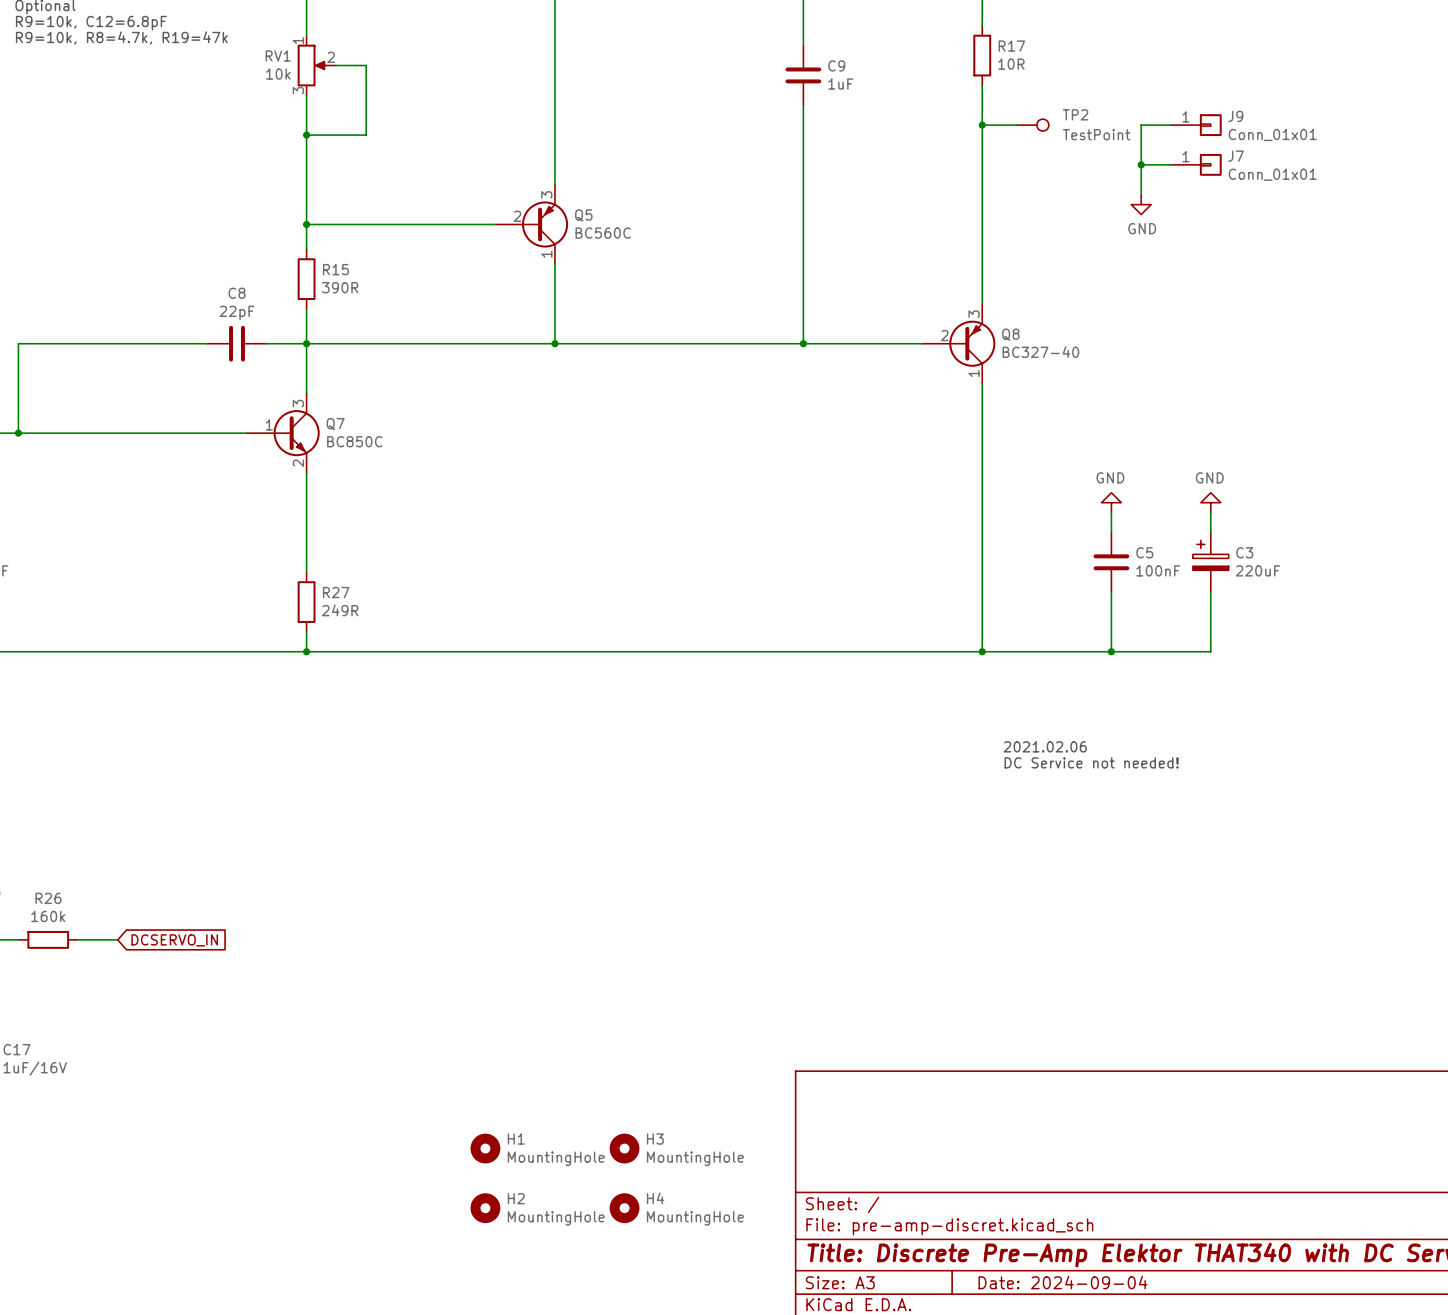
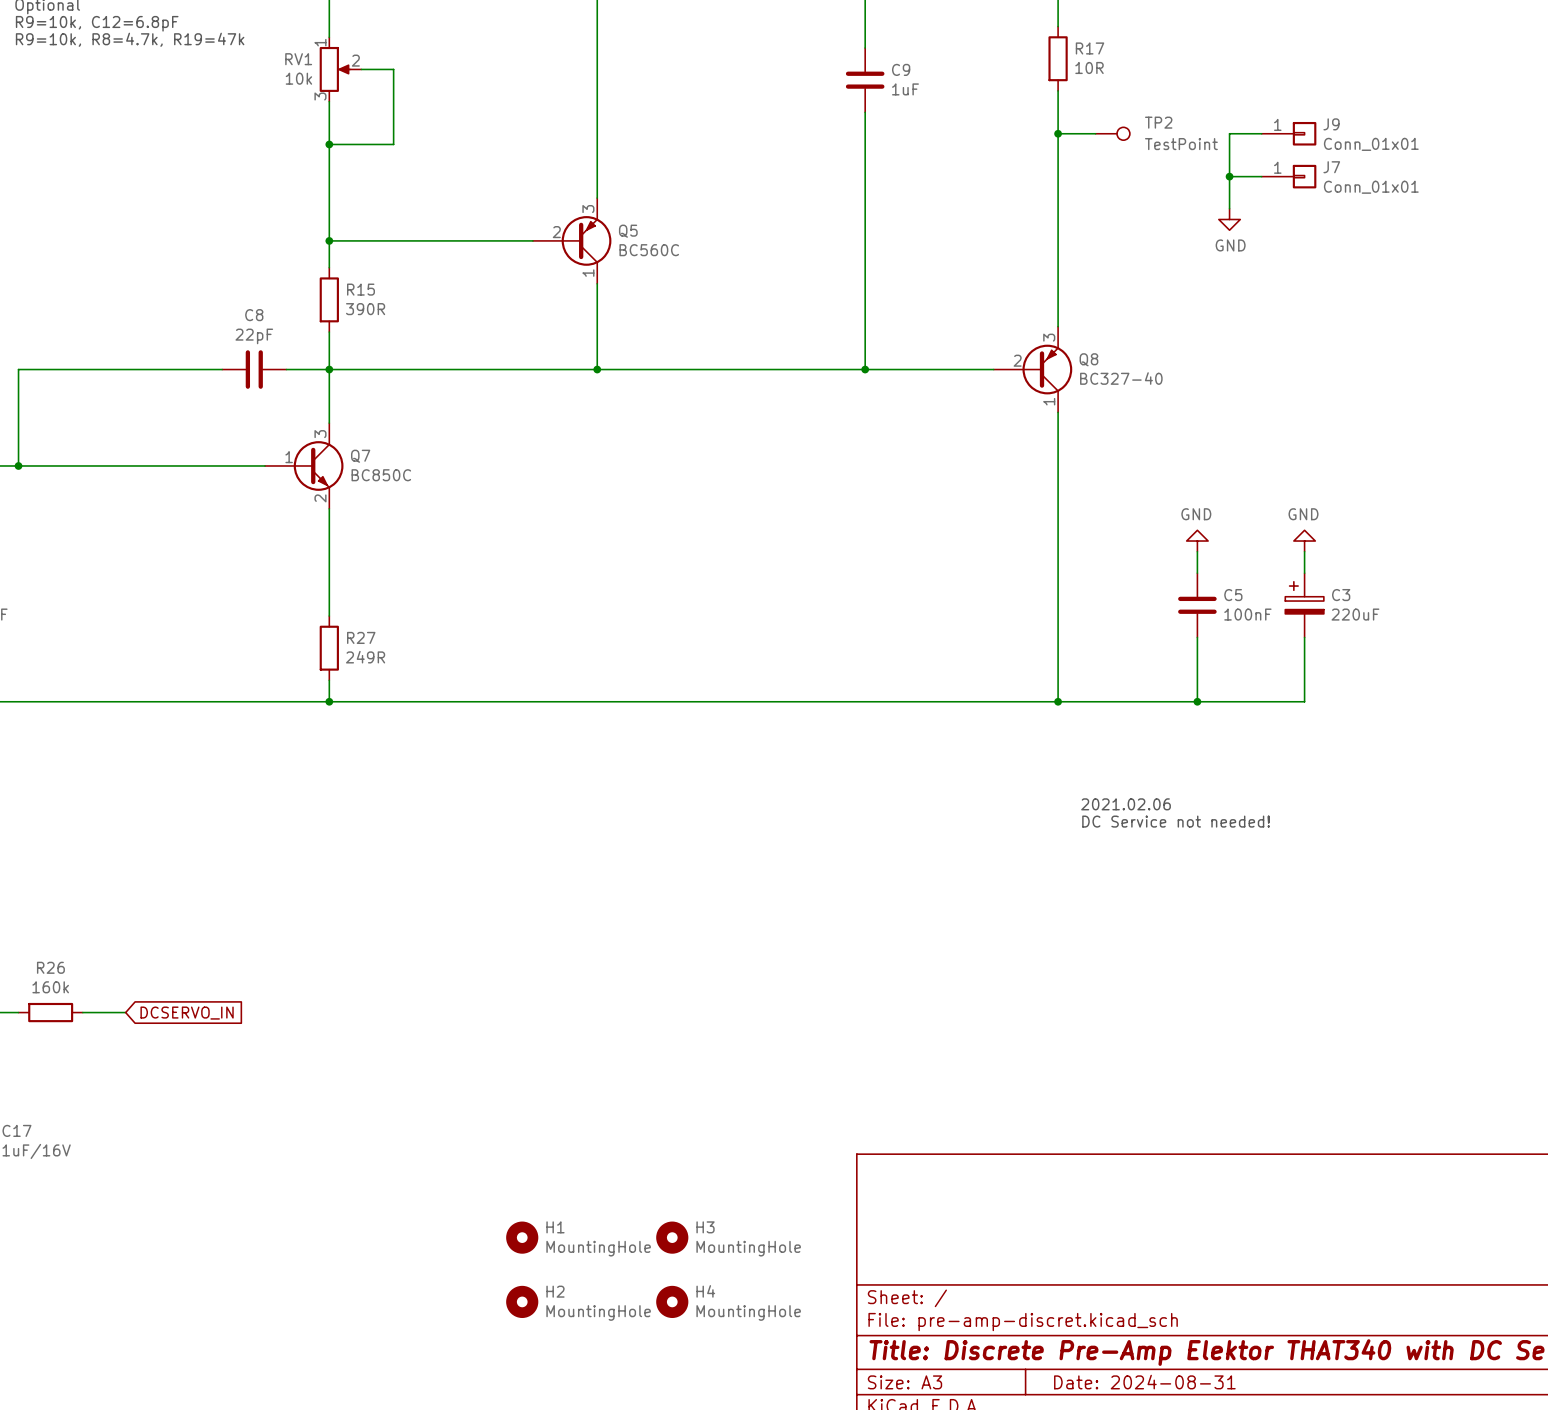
title block: Date: 2024-09-04 (1063, 1282) -> Date: 2024-08-31 (1144, 1382)

